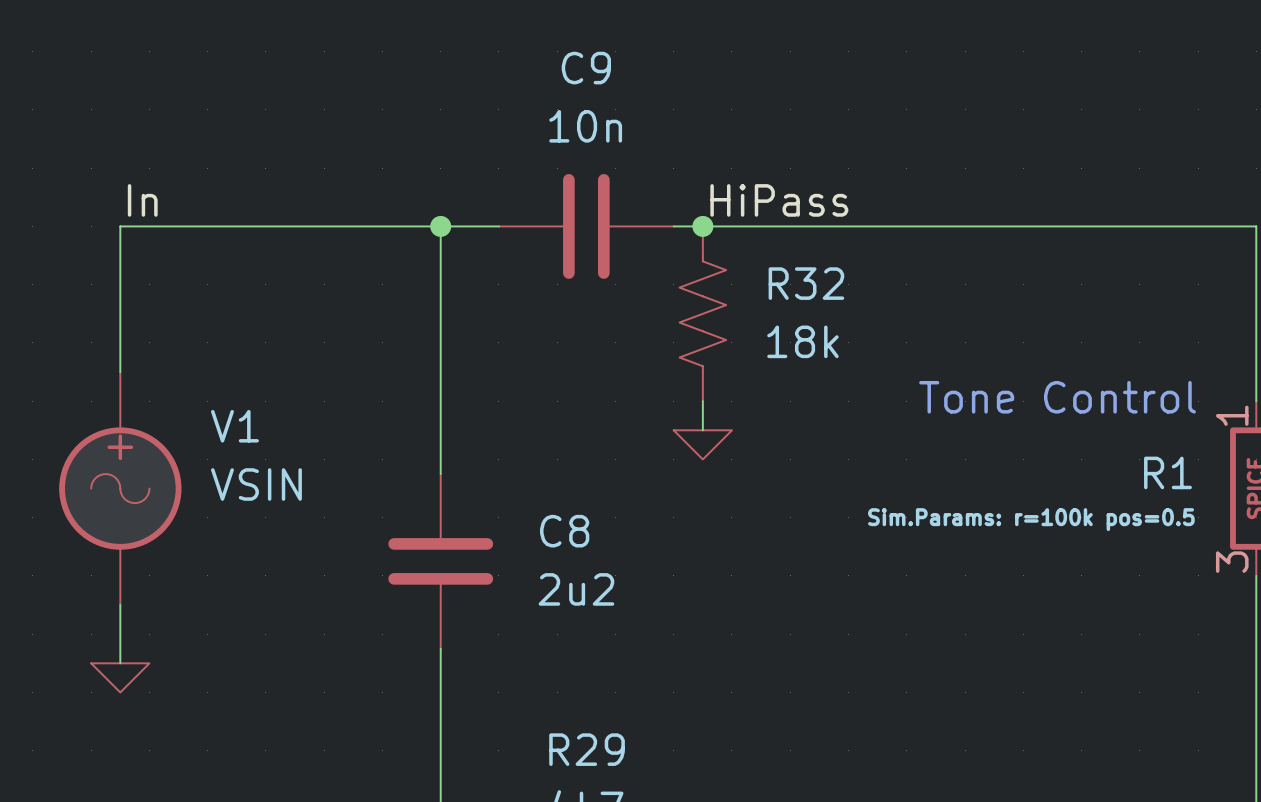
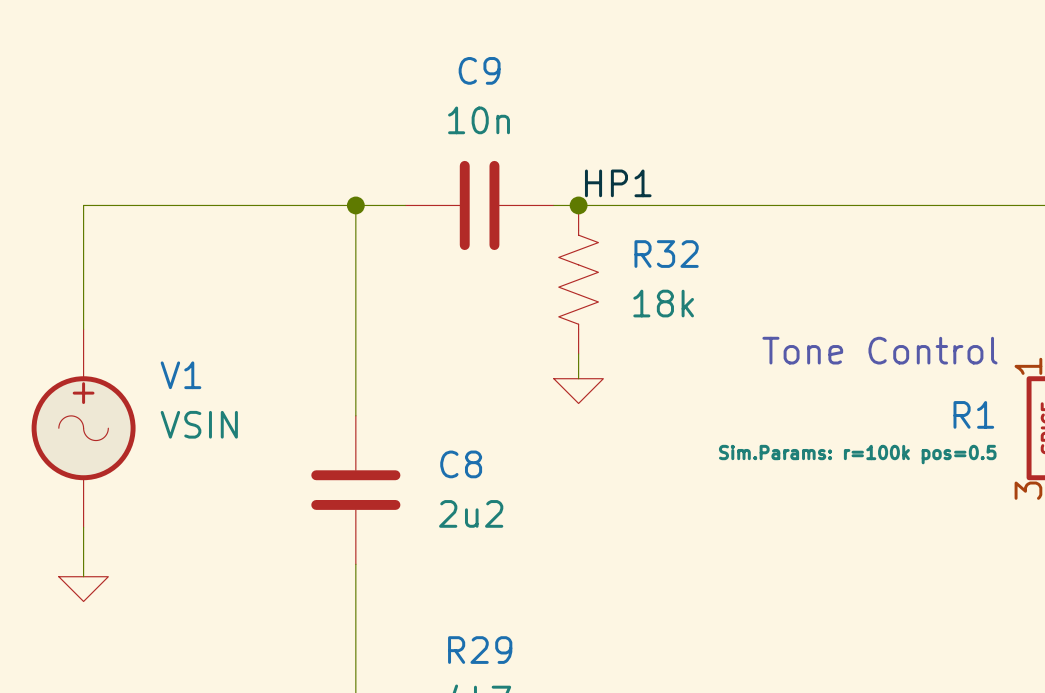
label: In (142, 200) -> none
label: HiPass (779, 200) -> HP1 (618, 183)

